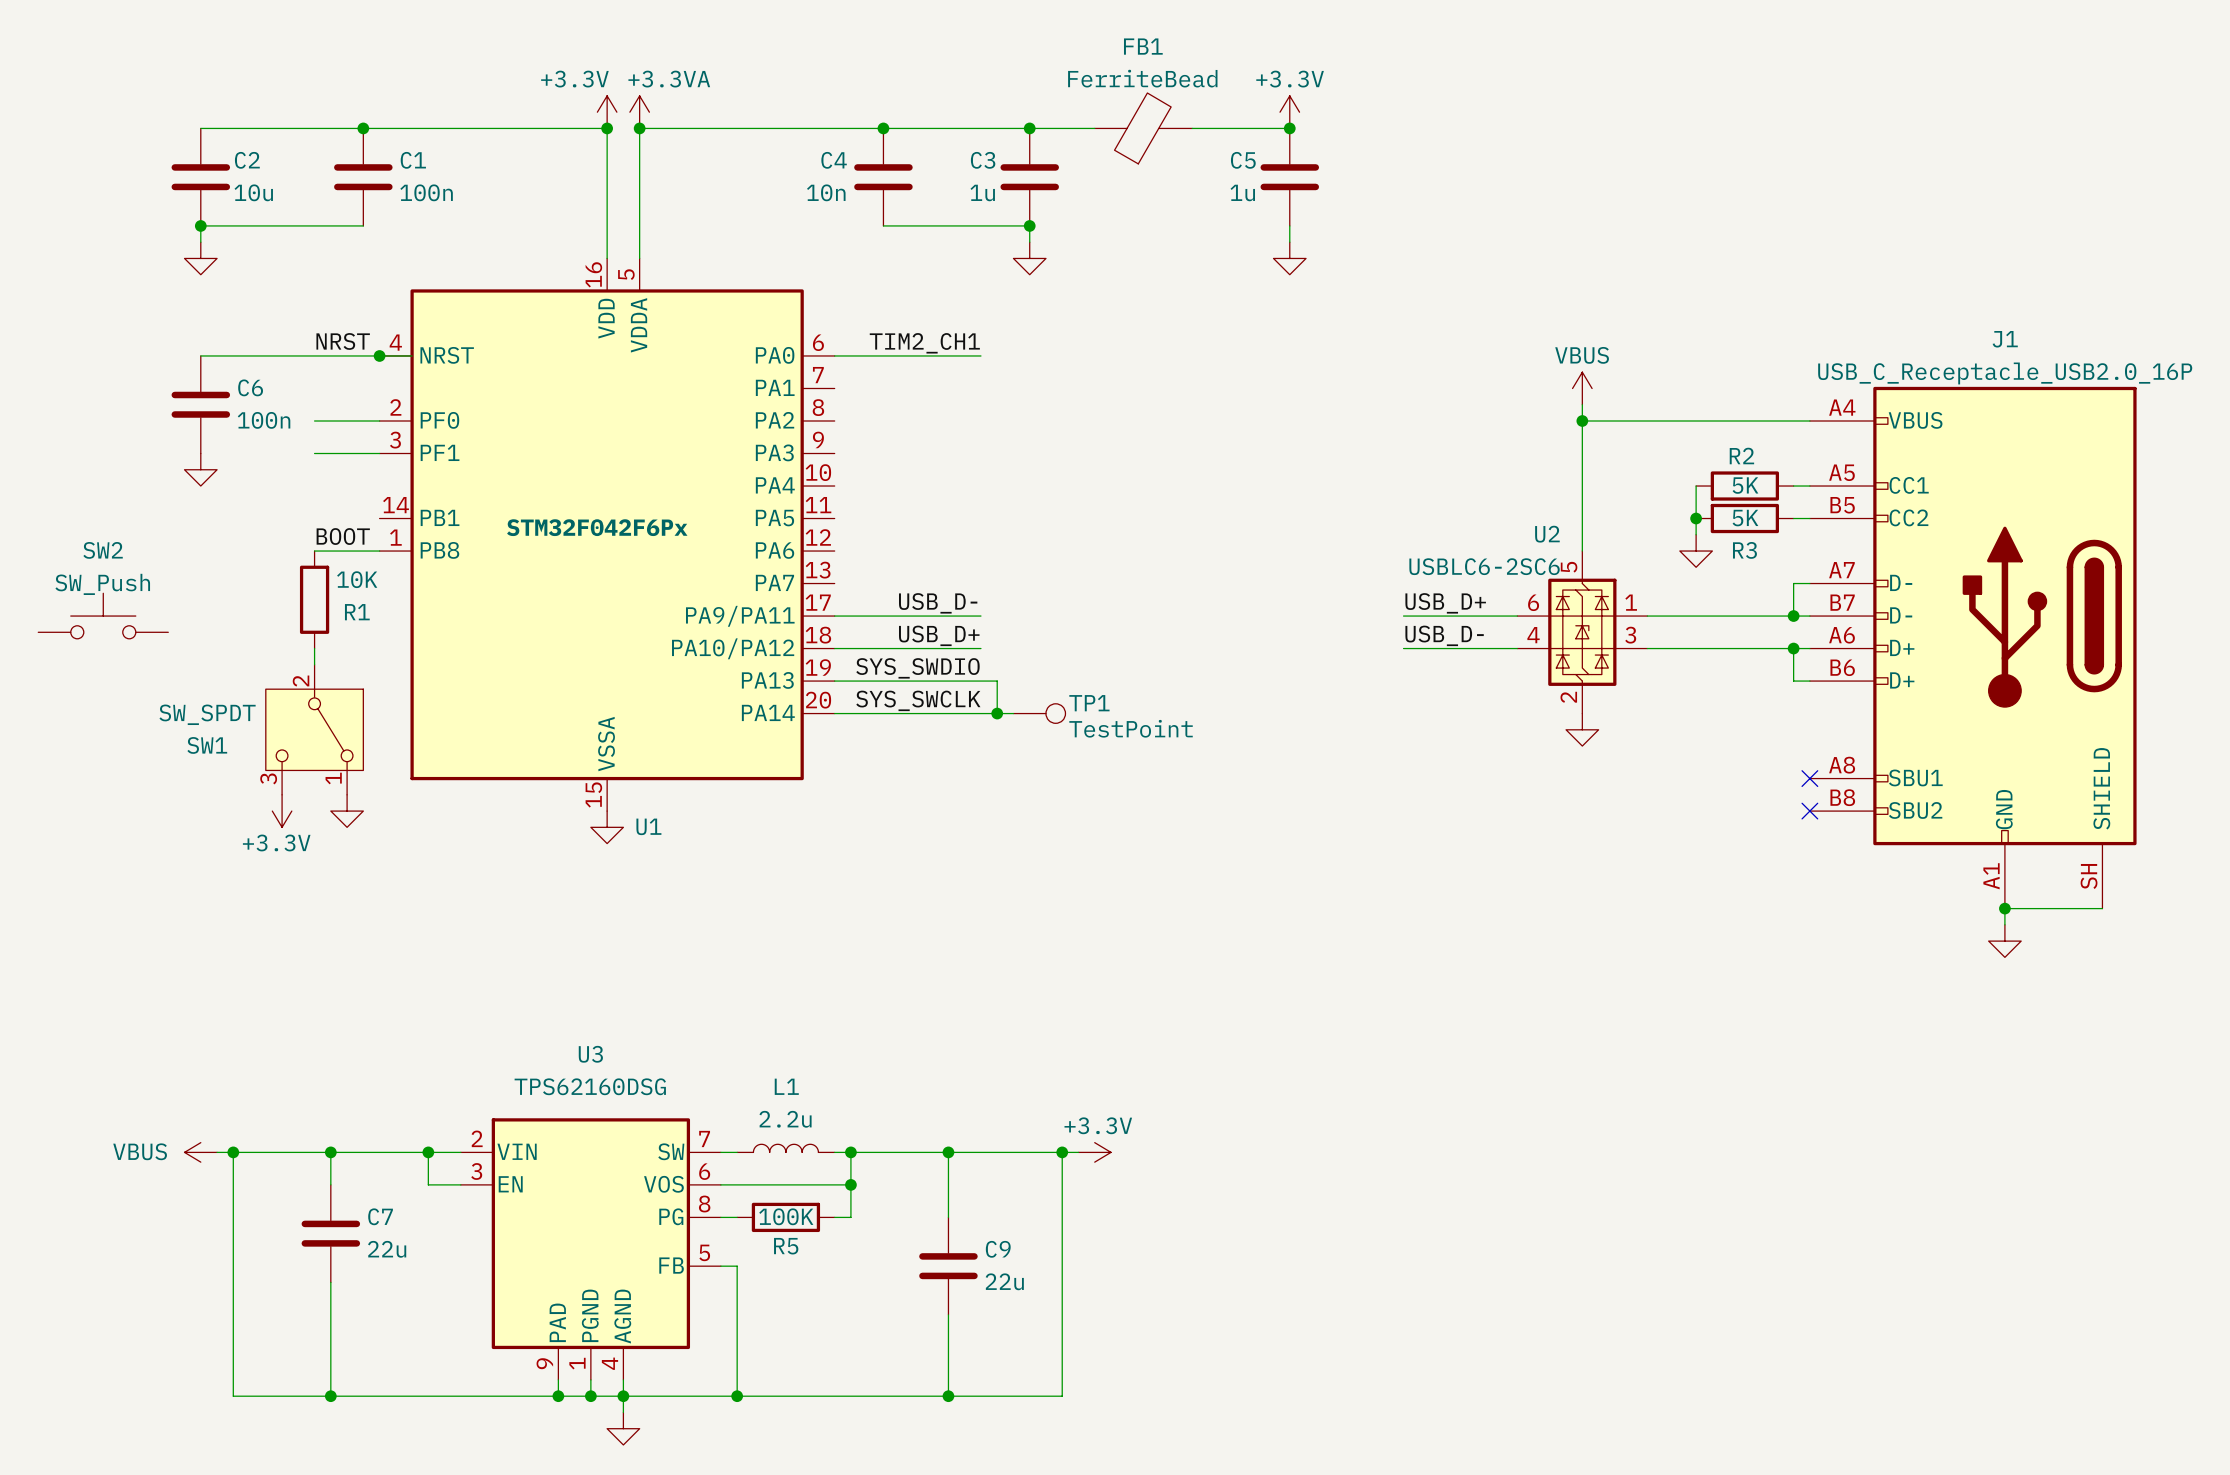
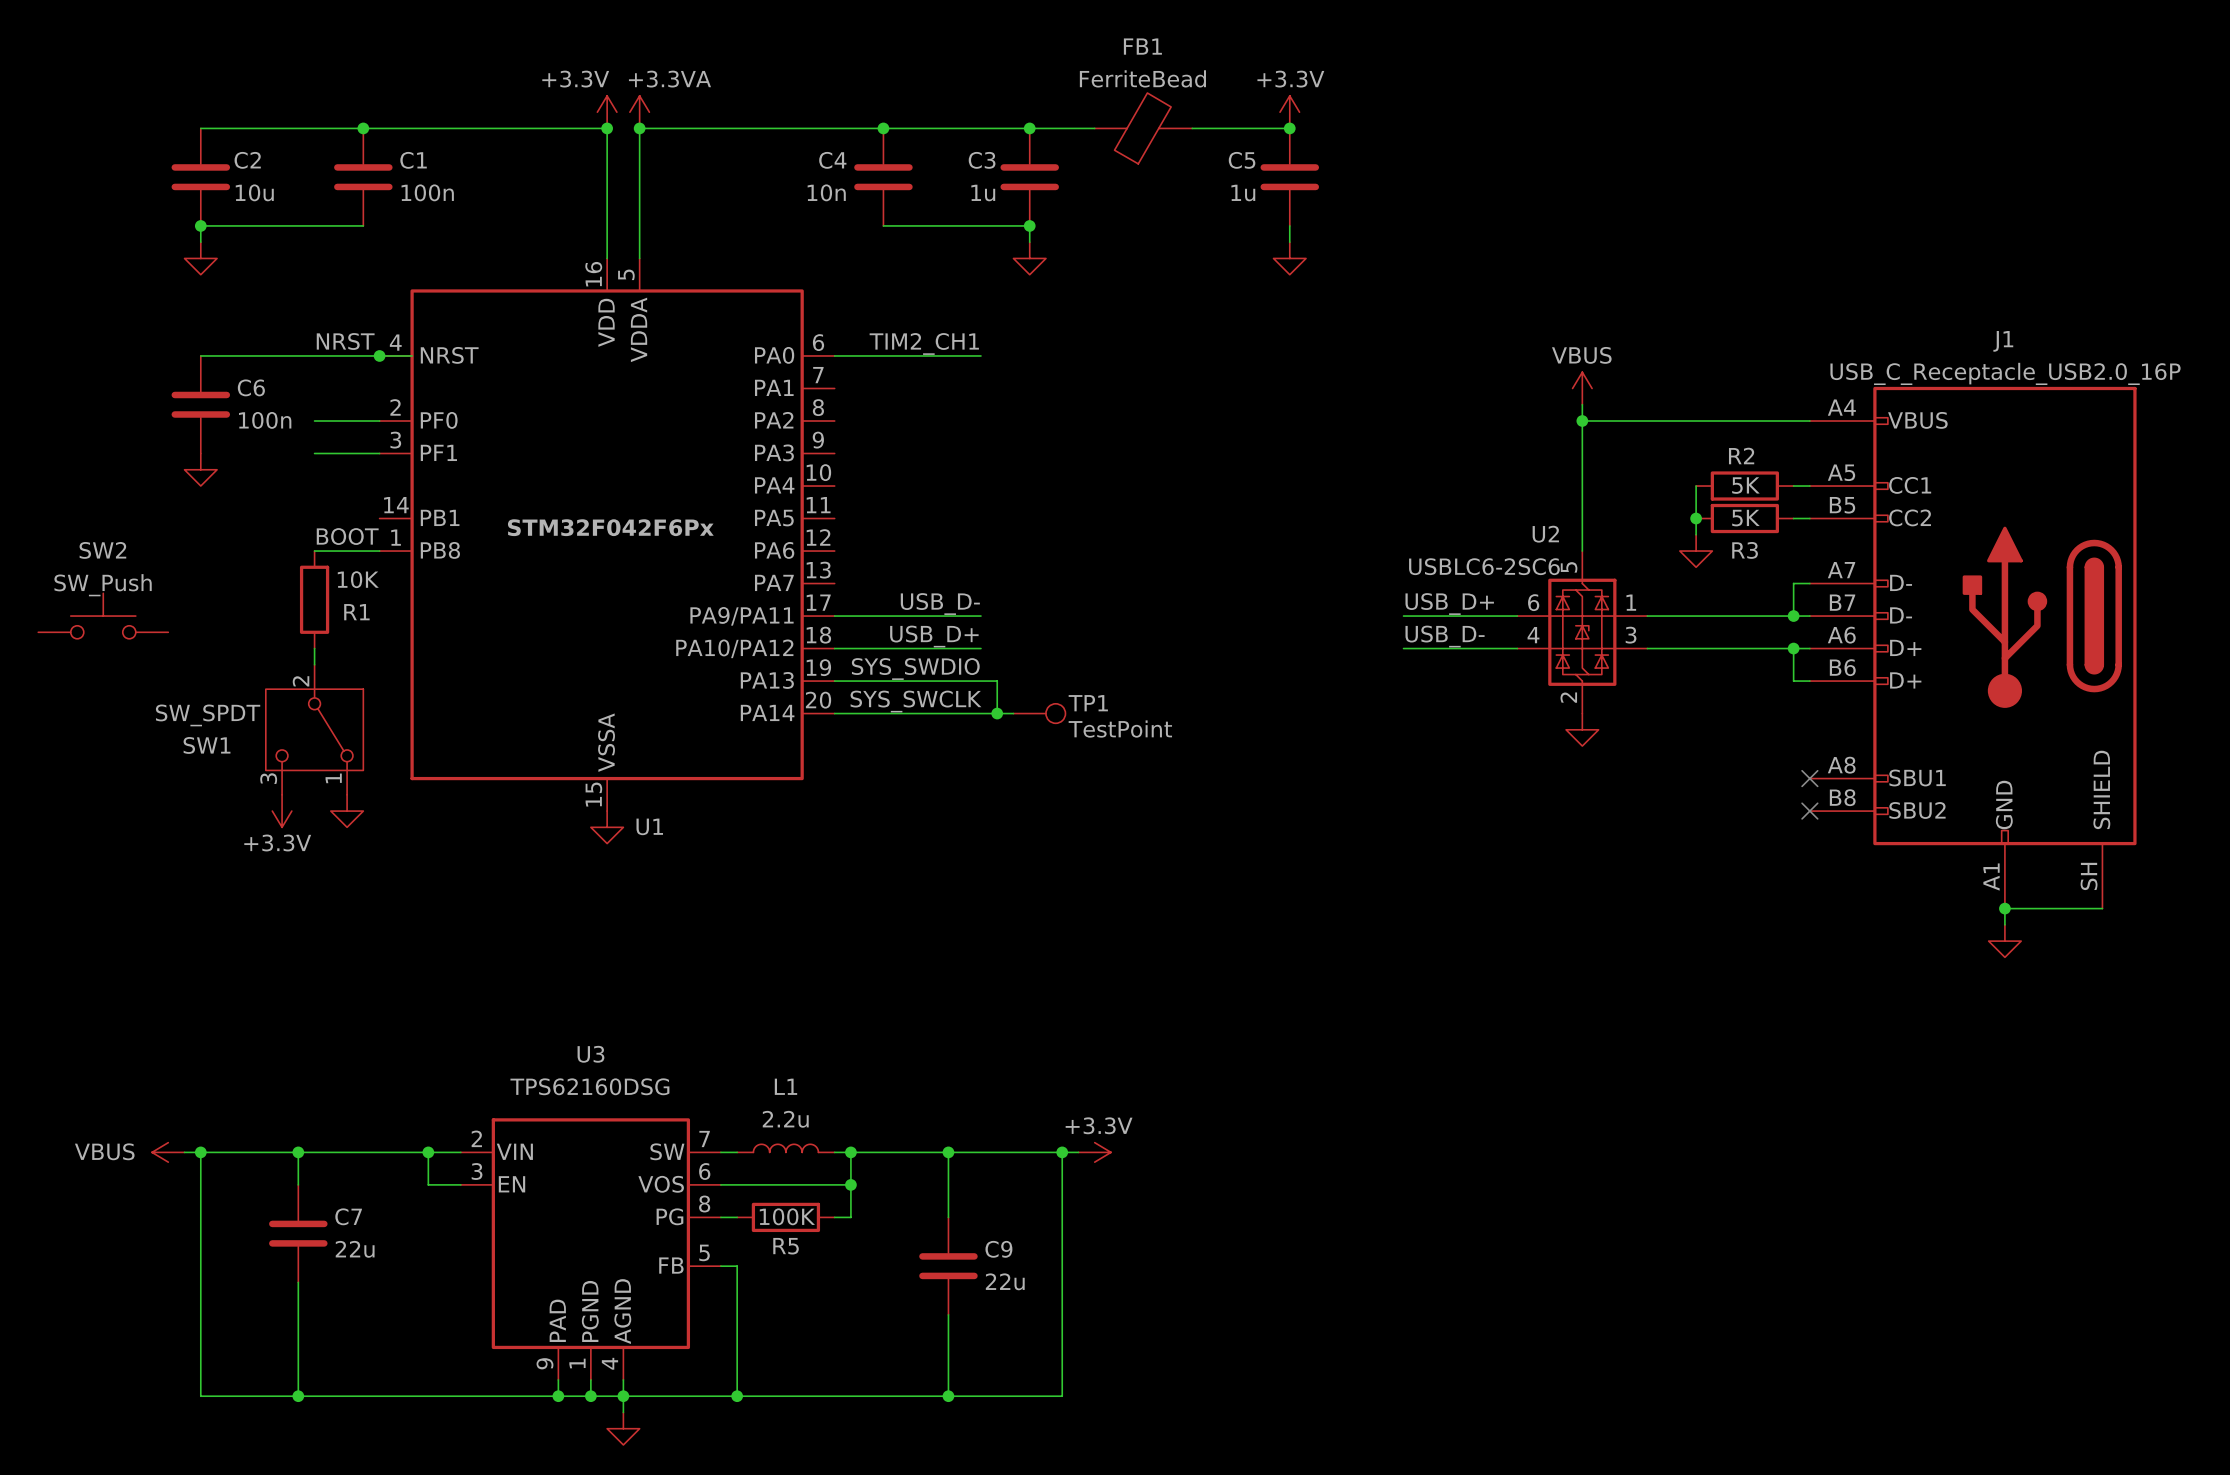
junction: none -> (200, 1152)
power symbol position: VBUS (200, 1152) -> VBUS (168, 1152)
wire: (233, 1152) (233, 1396) -> (200, 1152) (200, 1396) (233, 1396)
junction: (233, 1152) -> none
junction: none -> (298, 1152)
wire: (330, 1152) (330, 1184) -> (298, 1152) (298, 1184)
junction: (330, 1152) -> none
C7 position: (330, 1233) -> (298, 1233)
wire: (330, 1282) (330, 1396) -> (298, 1282) (298, 1396)
junction position: (330, 1396) -> (298, 1396)

